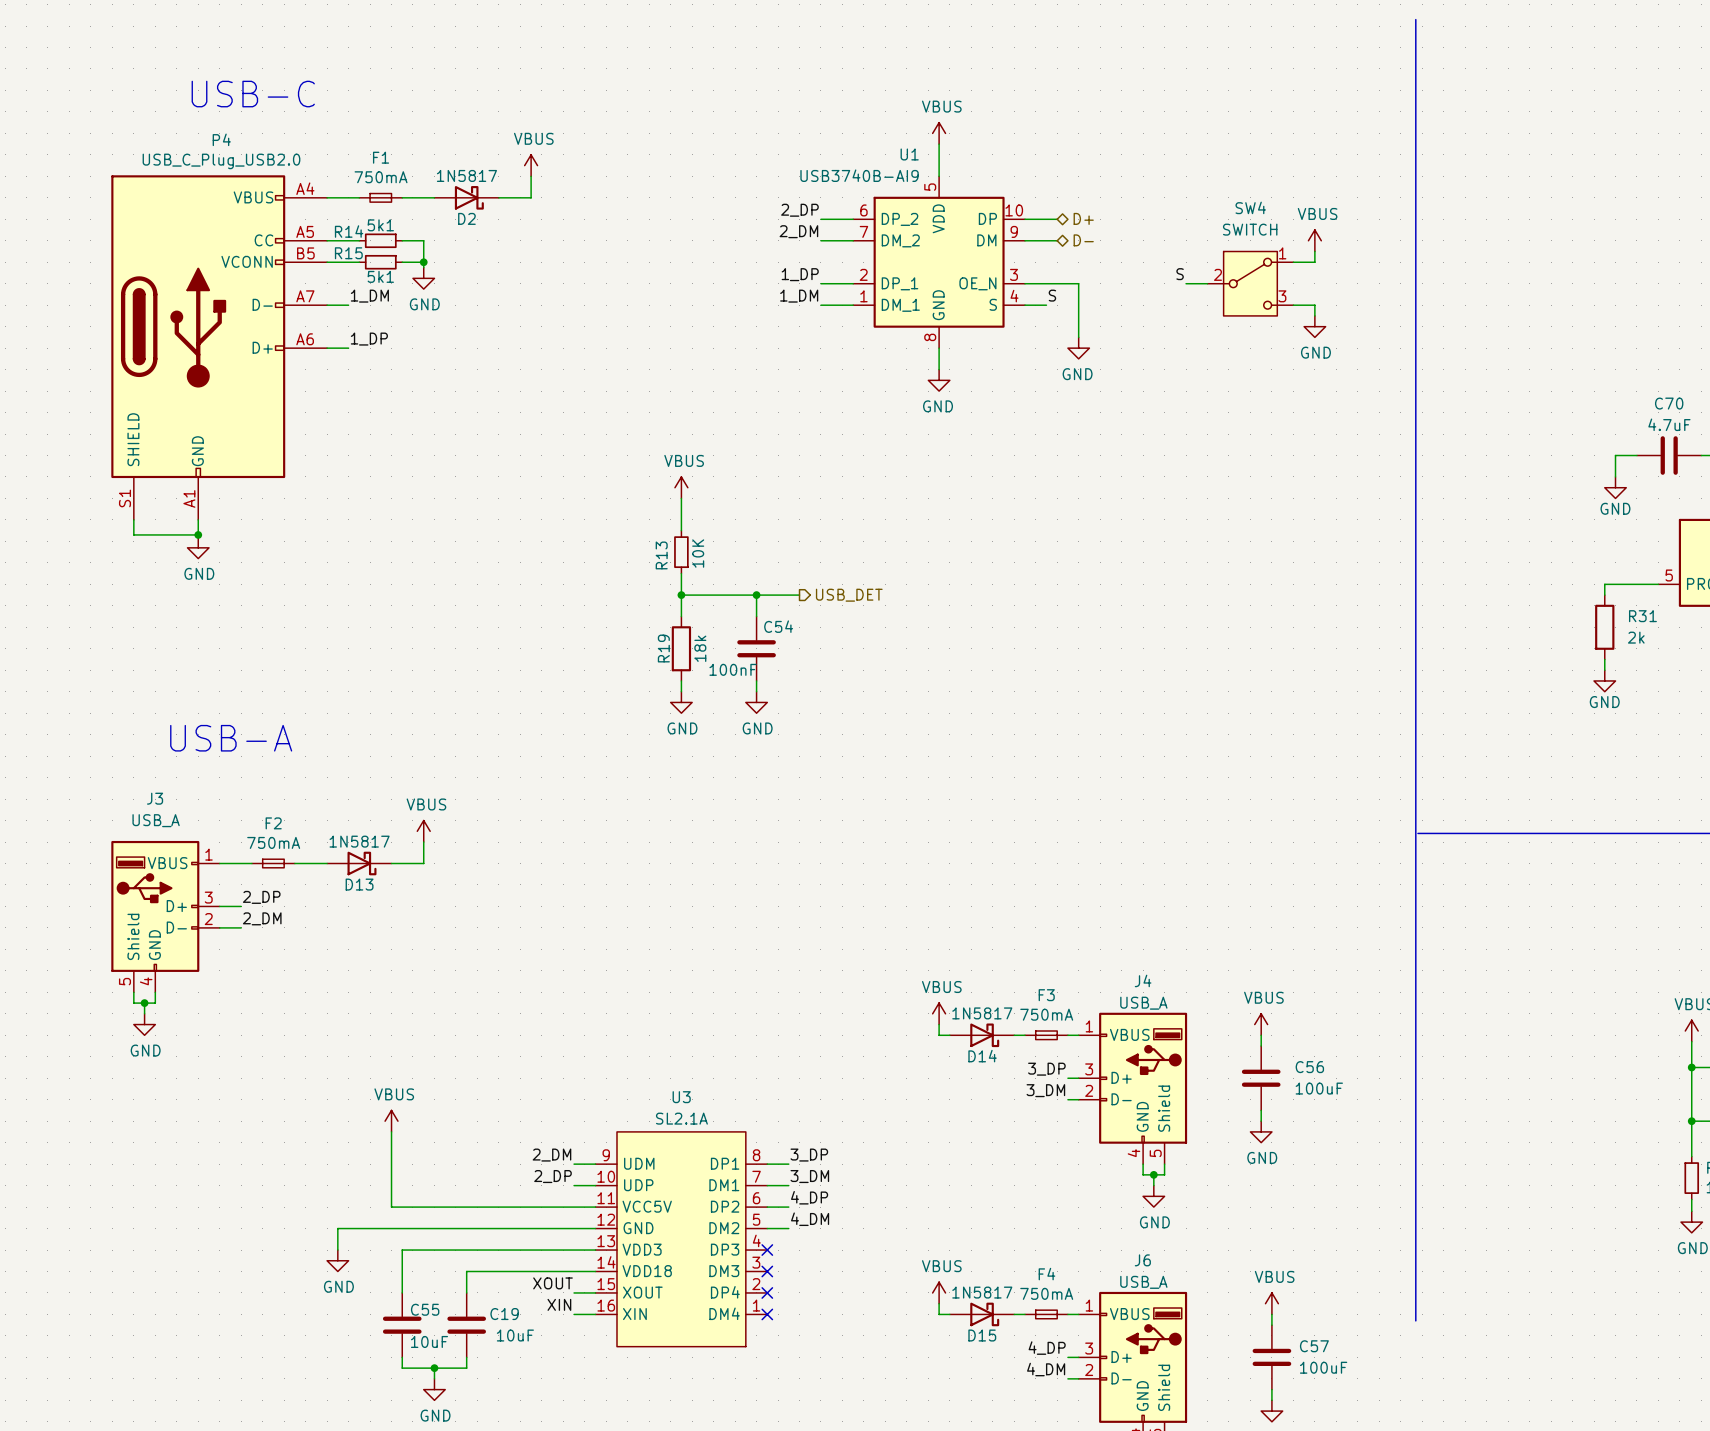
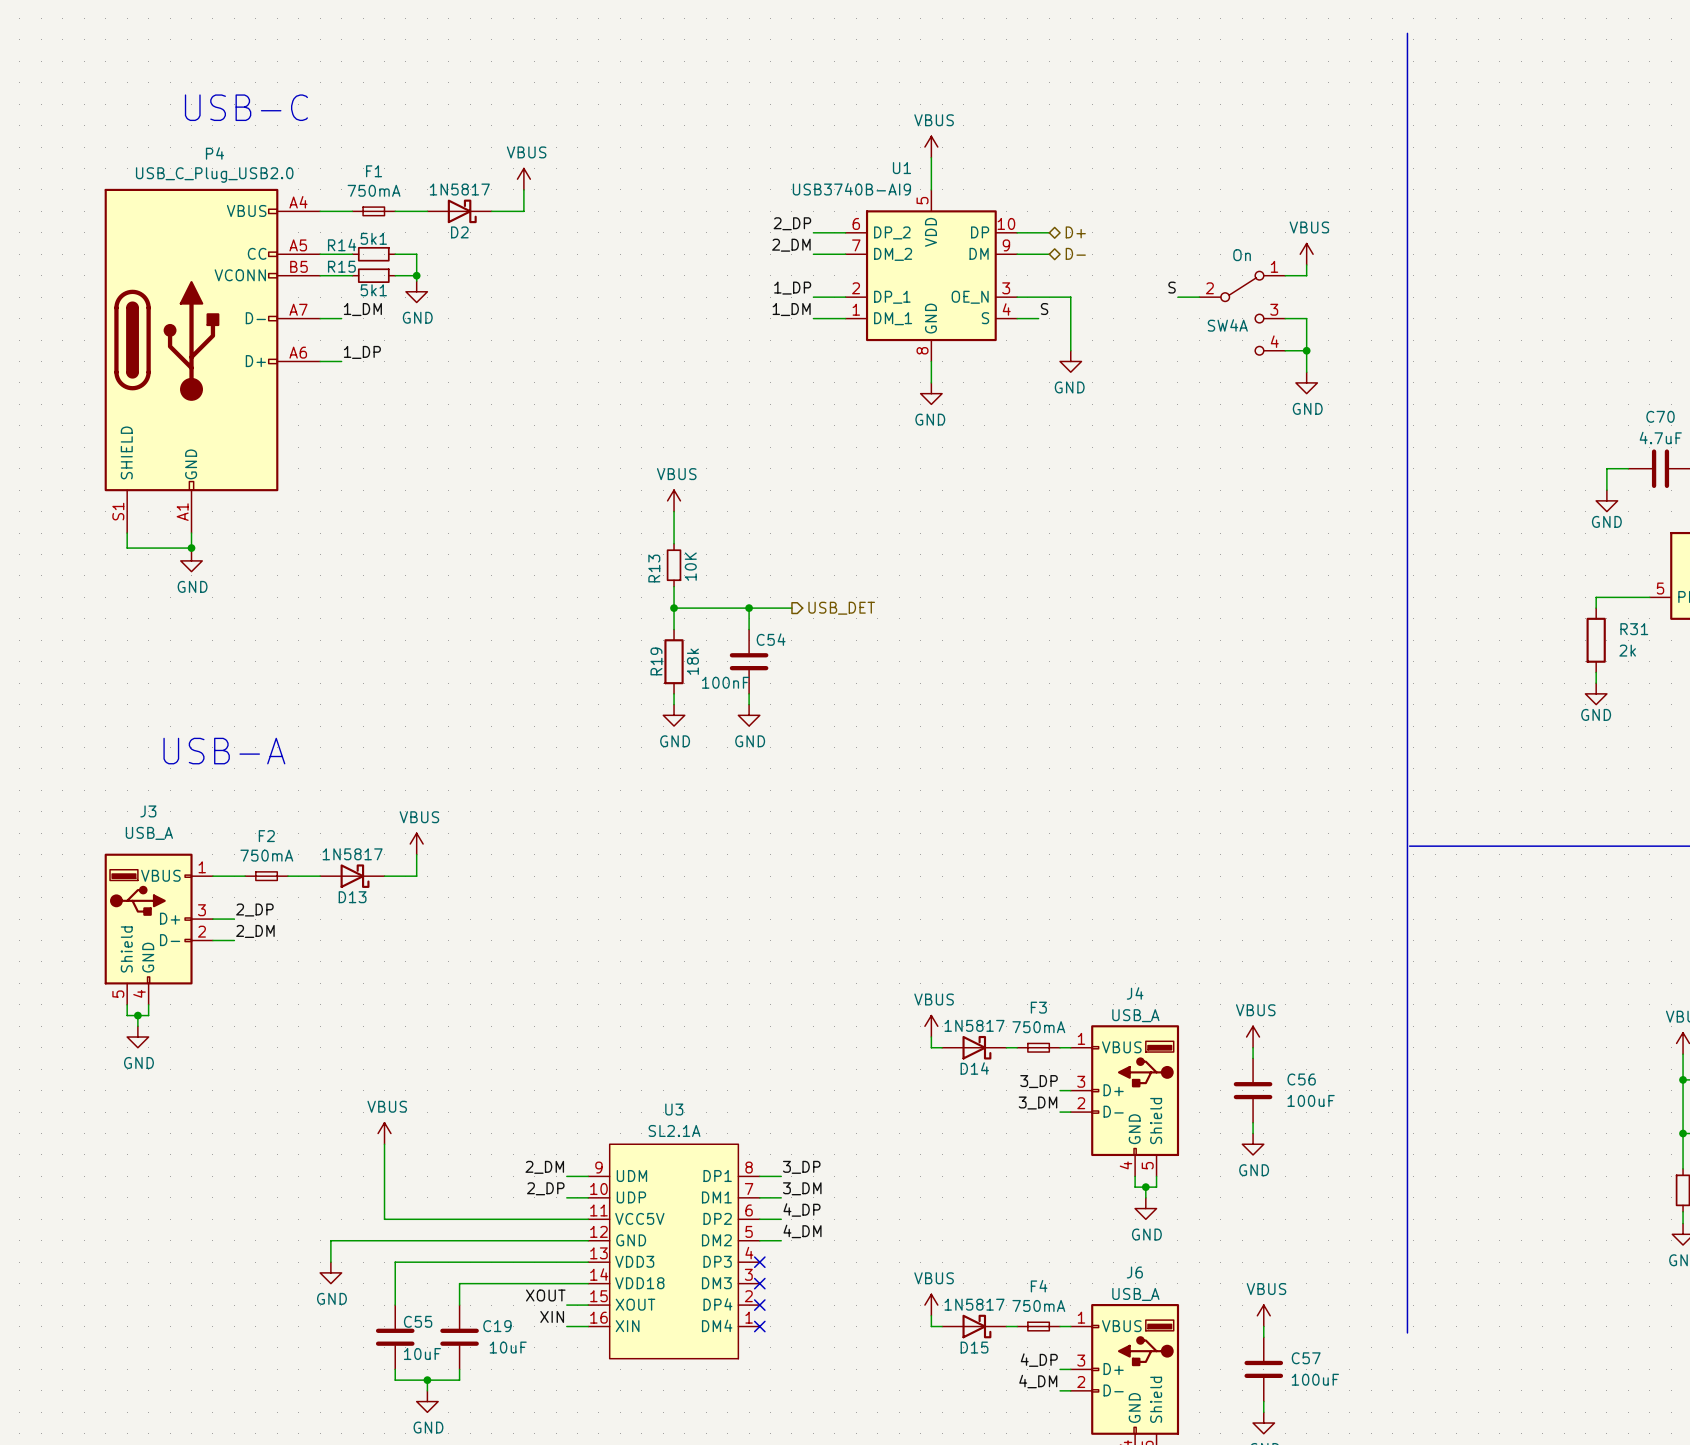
SW4: SWITCH (1250, 283) -> none
SW4A: none -> On (1242, 313)
wire: none -> (1306, 329) (1306, 372)
power symbol position: GND (1314, 326) -> GND (1306, 382)
wire: none -> (1285, 350) (1306, 350)
junction: none -> (1306, 350)

